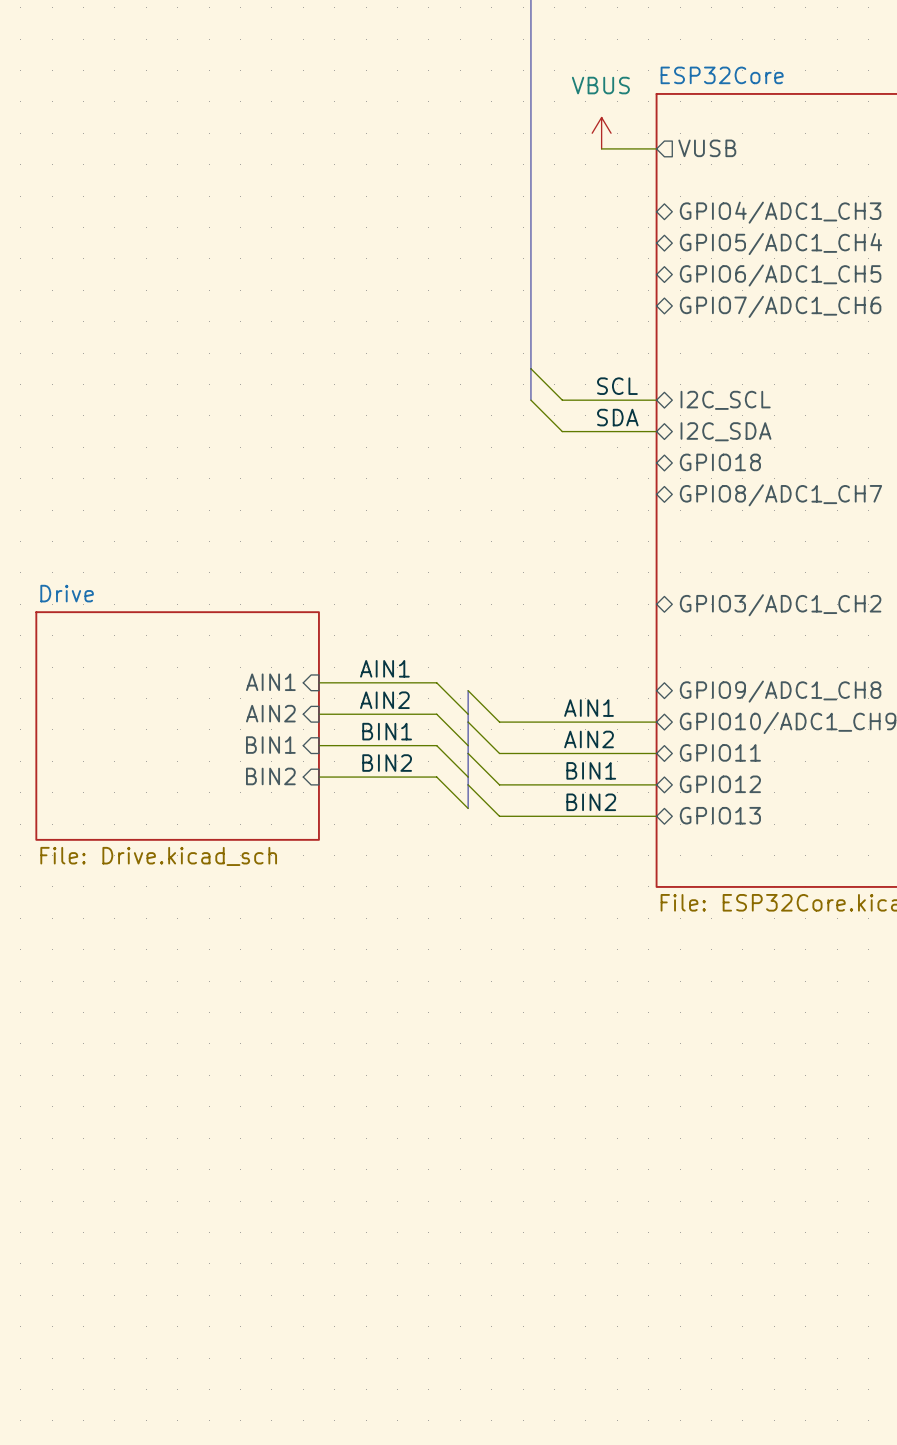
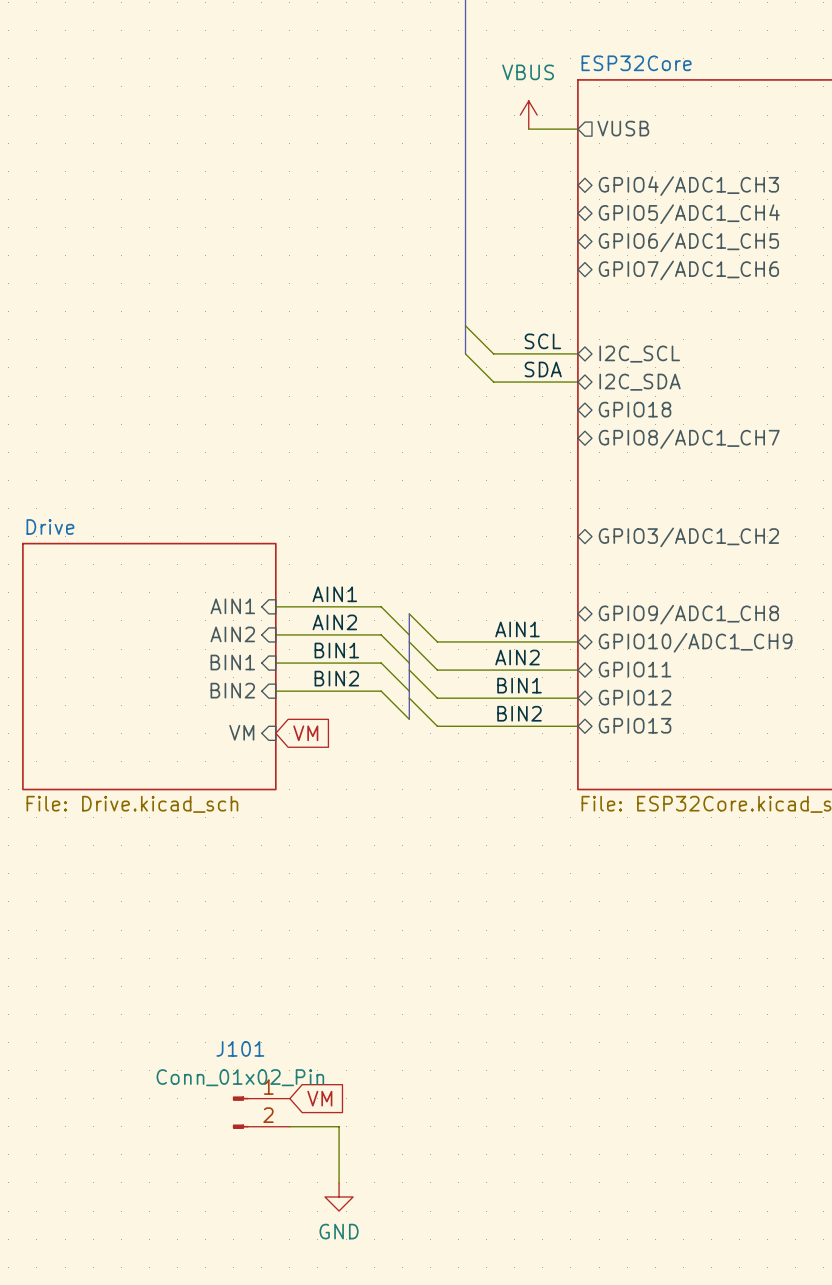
sheet Drive: File: Drive.kicad_sch (177, 726) -> none
sheet Drive: none -> File: Drive.kicad_sch (149, 666)
sheet pin: none -> VM (241, 732)
global label: none -> VM (305, 733)
global label: none -> VM (319, 1098)
J101: none -> Conn_01x02_Pin (261, 1112)
wire: none -> (289, 1126) (339, 1126) (339, 1182)
power symbol: none -> GND (339, 1196)

